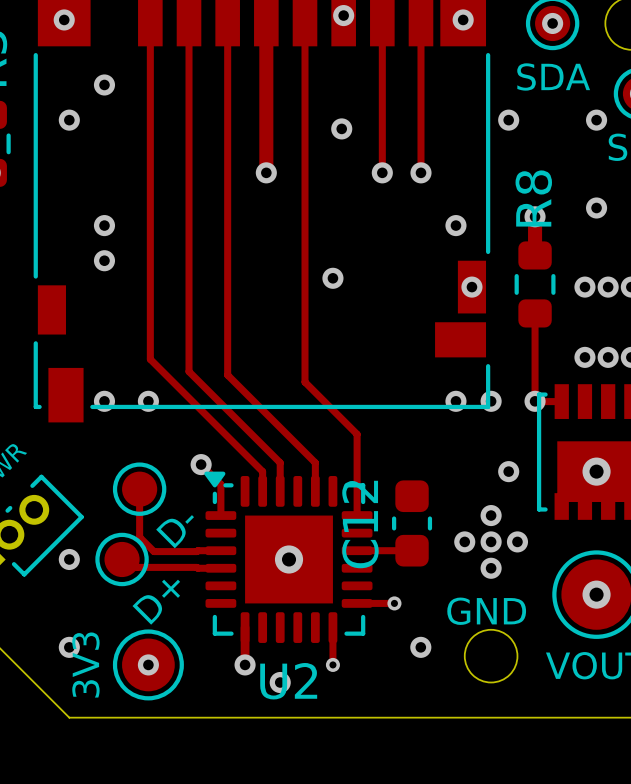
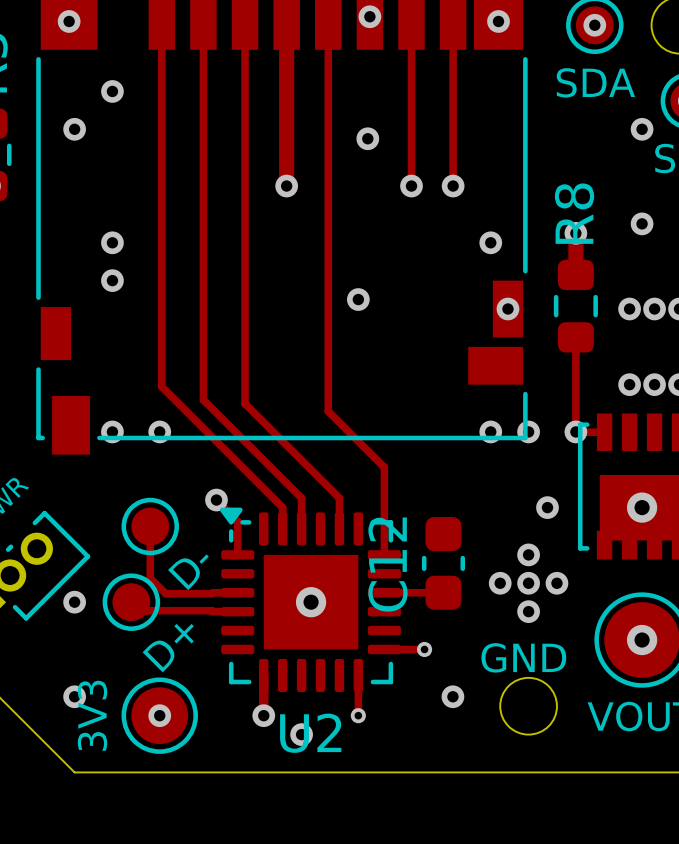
via: (508, 120) -> none

